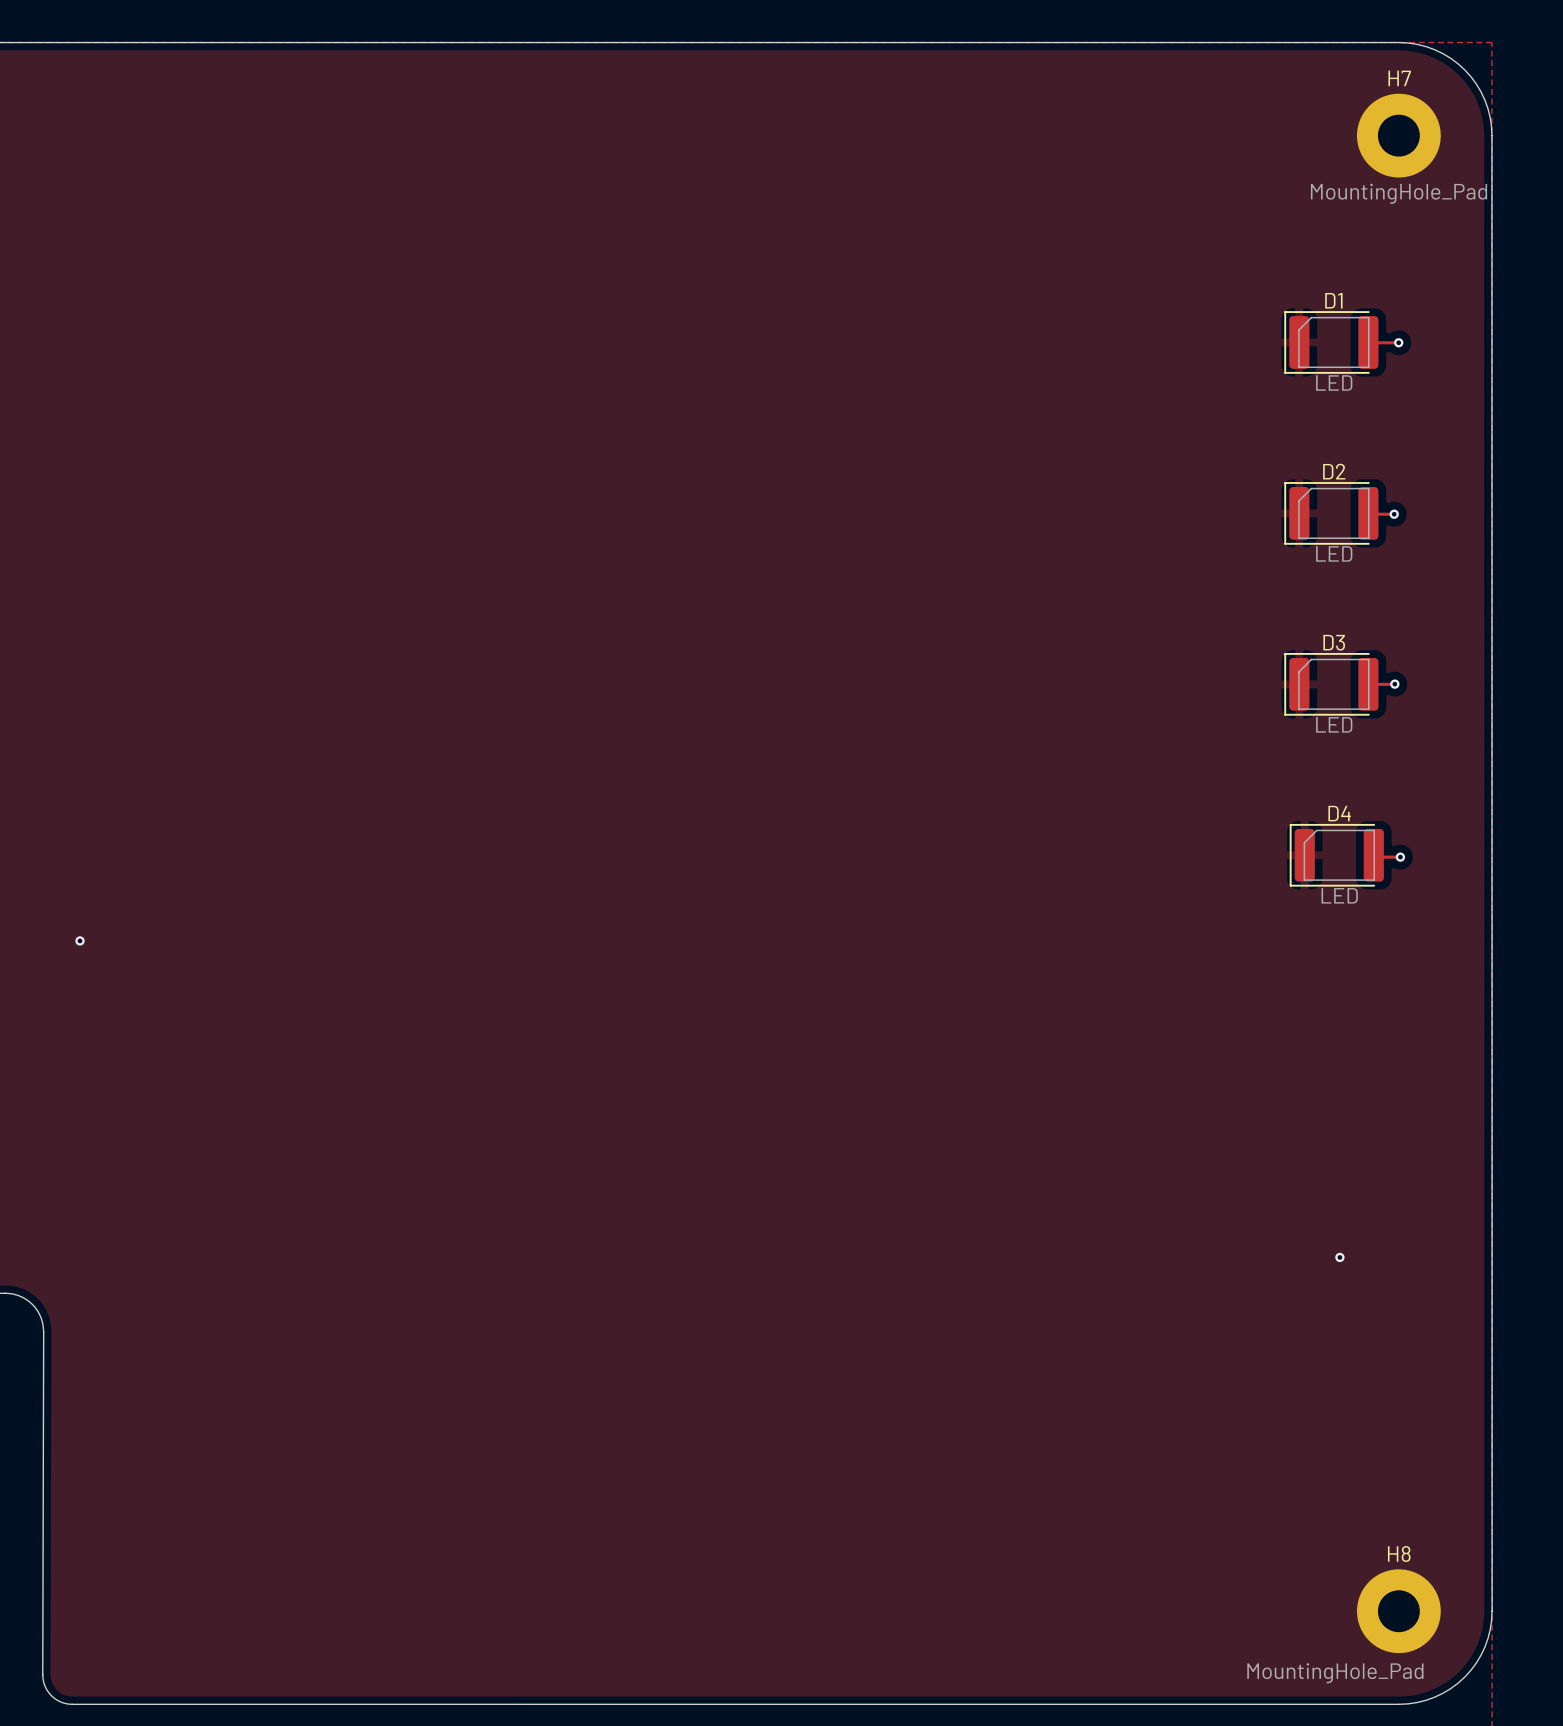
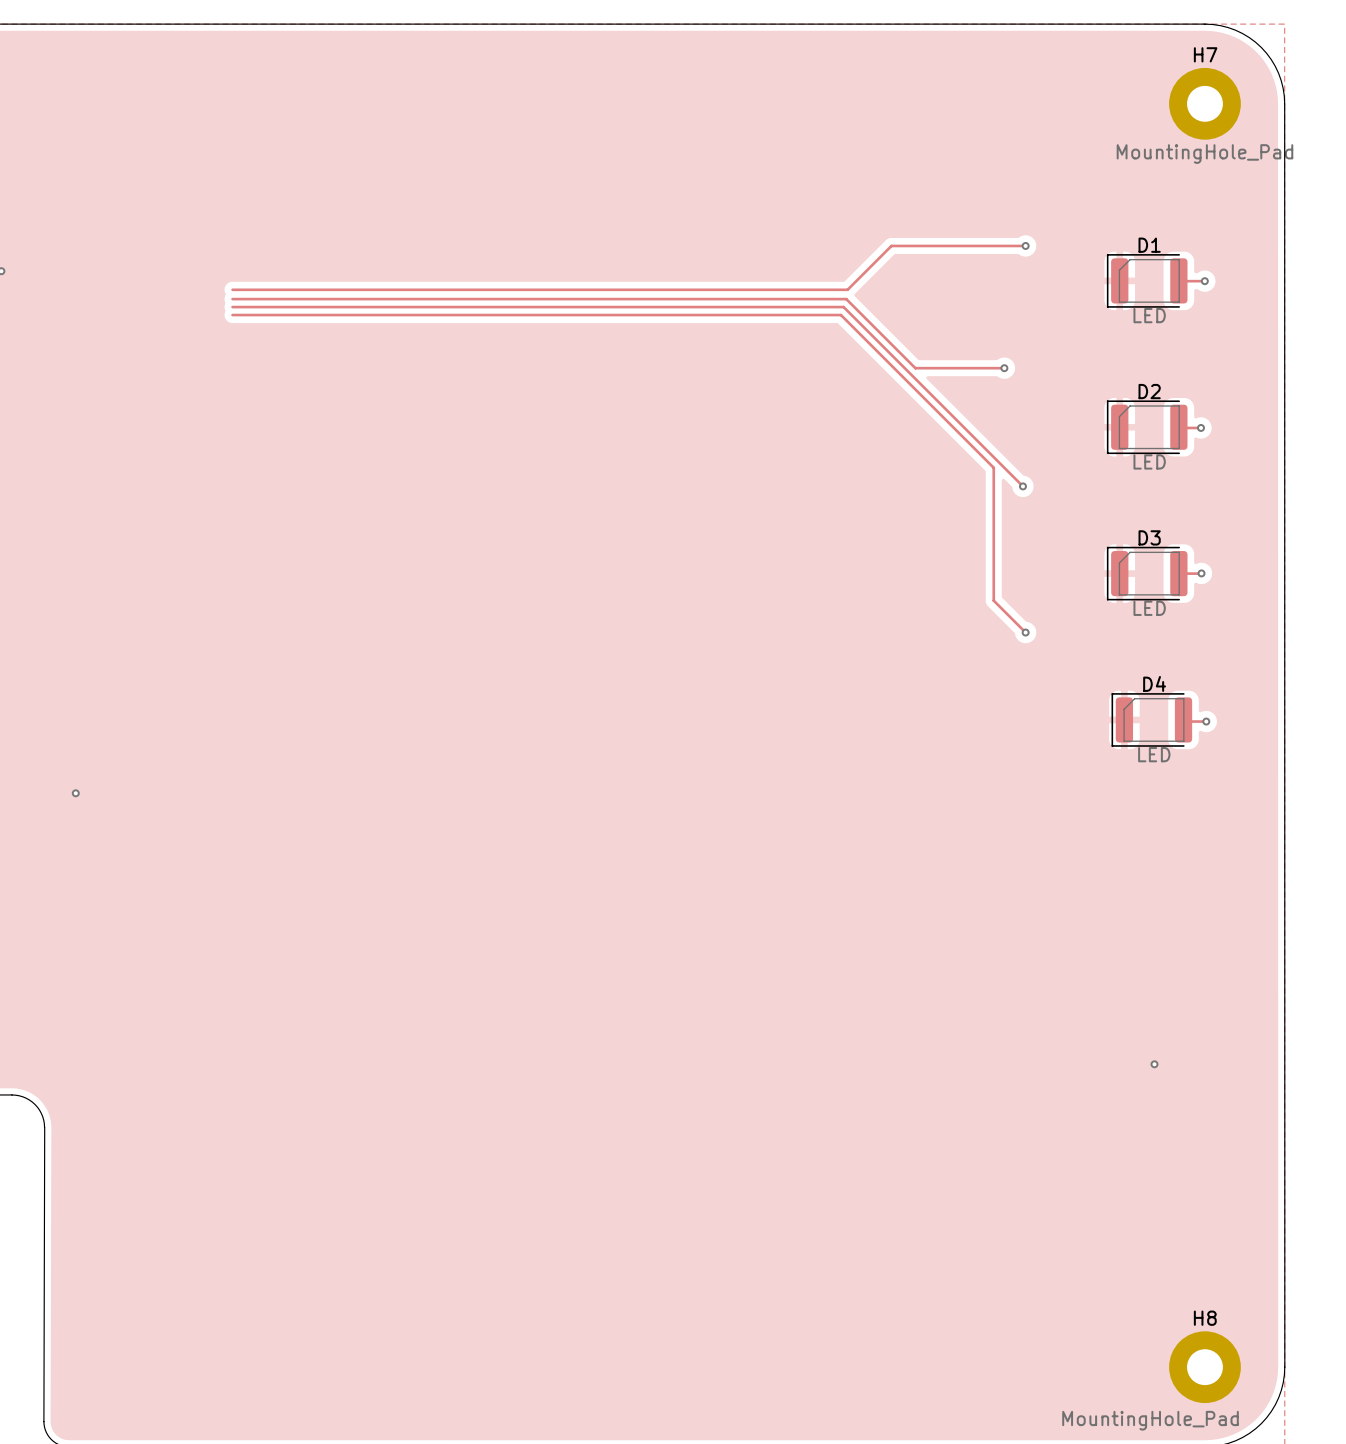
track: none -> (1025, 245) (891, 245) (847, 289) (232, 289)
via: none -> (1025, 245)
track: none -> (232, 299) (846, 299) (915, 368) (1004, 368)
track: none -> (232, 307) (843, 307) (1022, 486)
track: none -> (232, 315) (840, 315) (993, 467) (993, 600) (1025, 632)
via: none -> (1004, 368)
via: none -> (1022, 486)
via: none -> (1025, 632)

